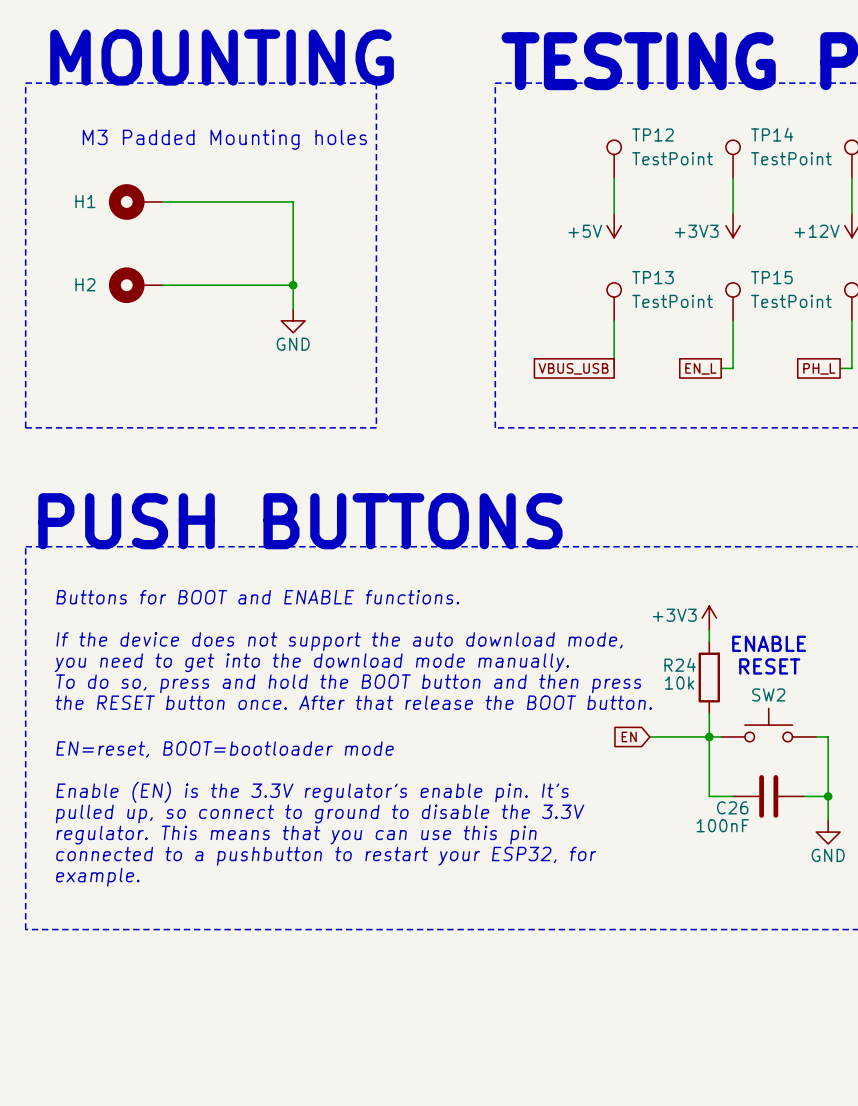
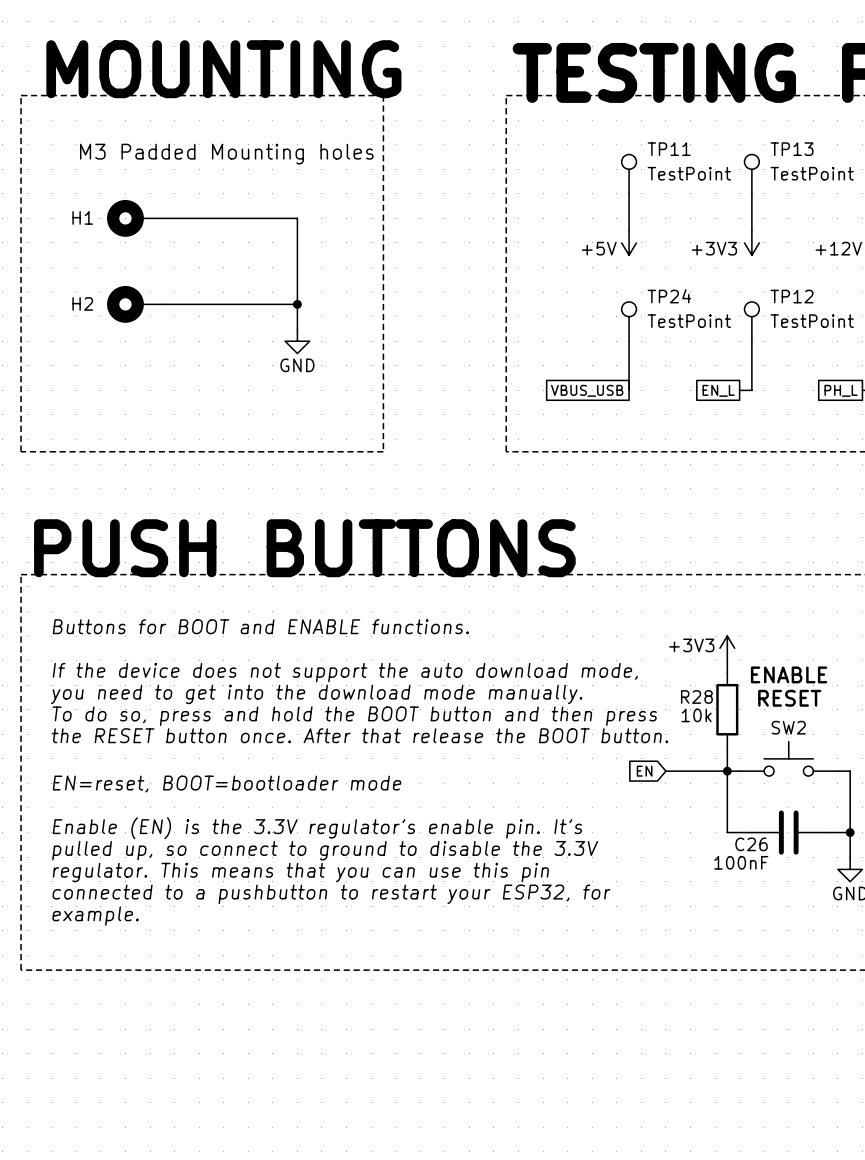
TP12 name: TP12 (652, 134) -> TP11 (669, 149)
TP14 name: TP14 (772, 134) -> TP13 (791, 149)
TP13 name: TP13 (652, 277) -> TP24 (669, 296)
TP15 name: TP15 (771, 277) -> TP12 (791, 296)
R24 name: R24 (680, 664) -> R28 (696, 696)

